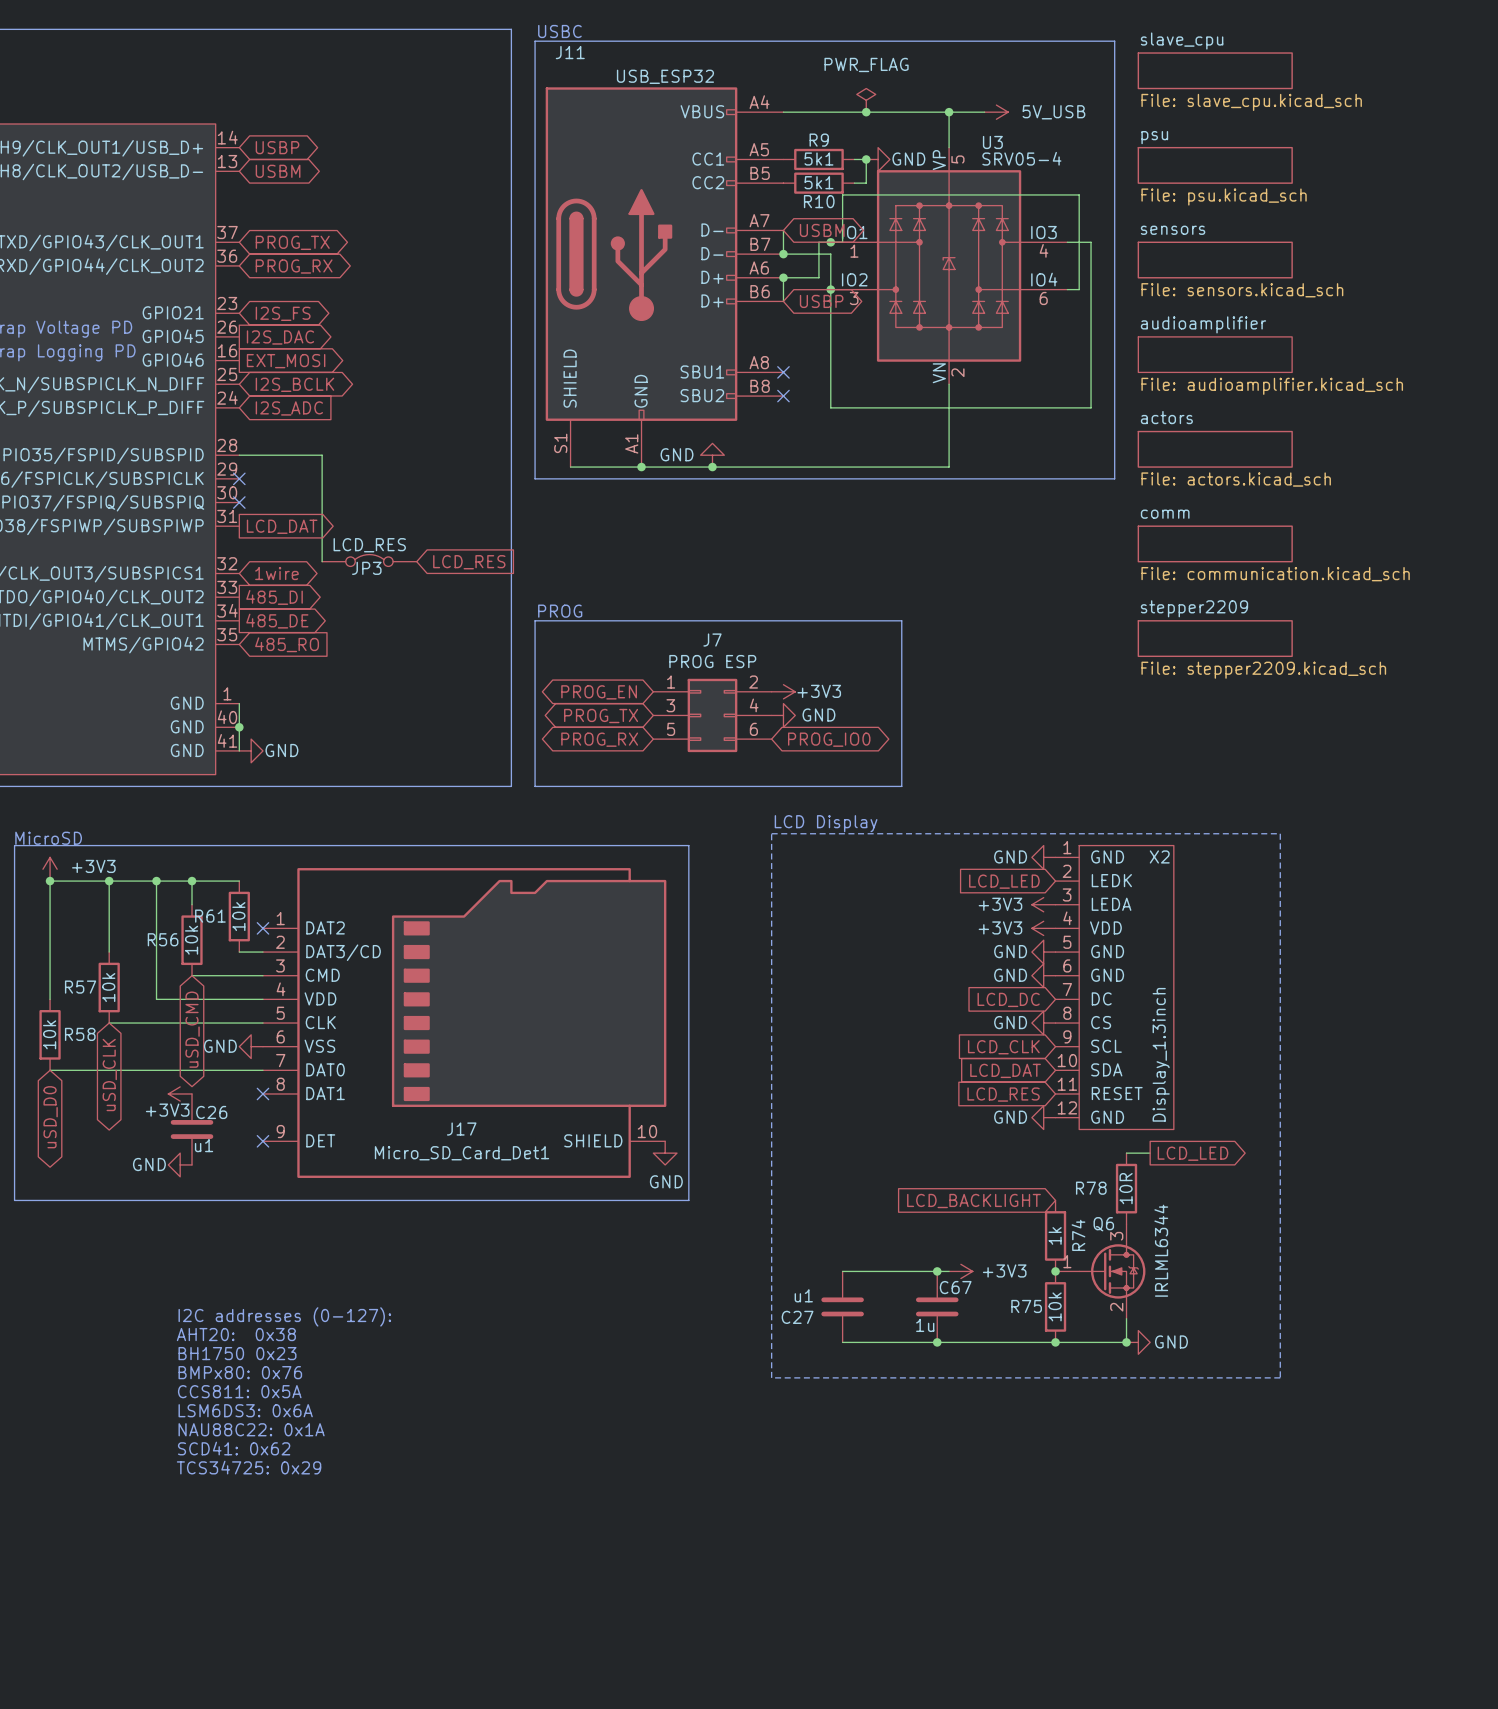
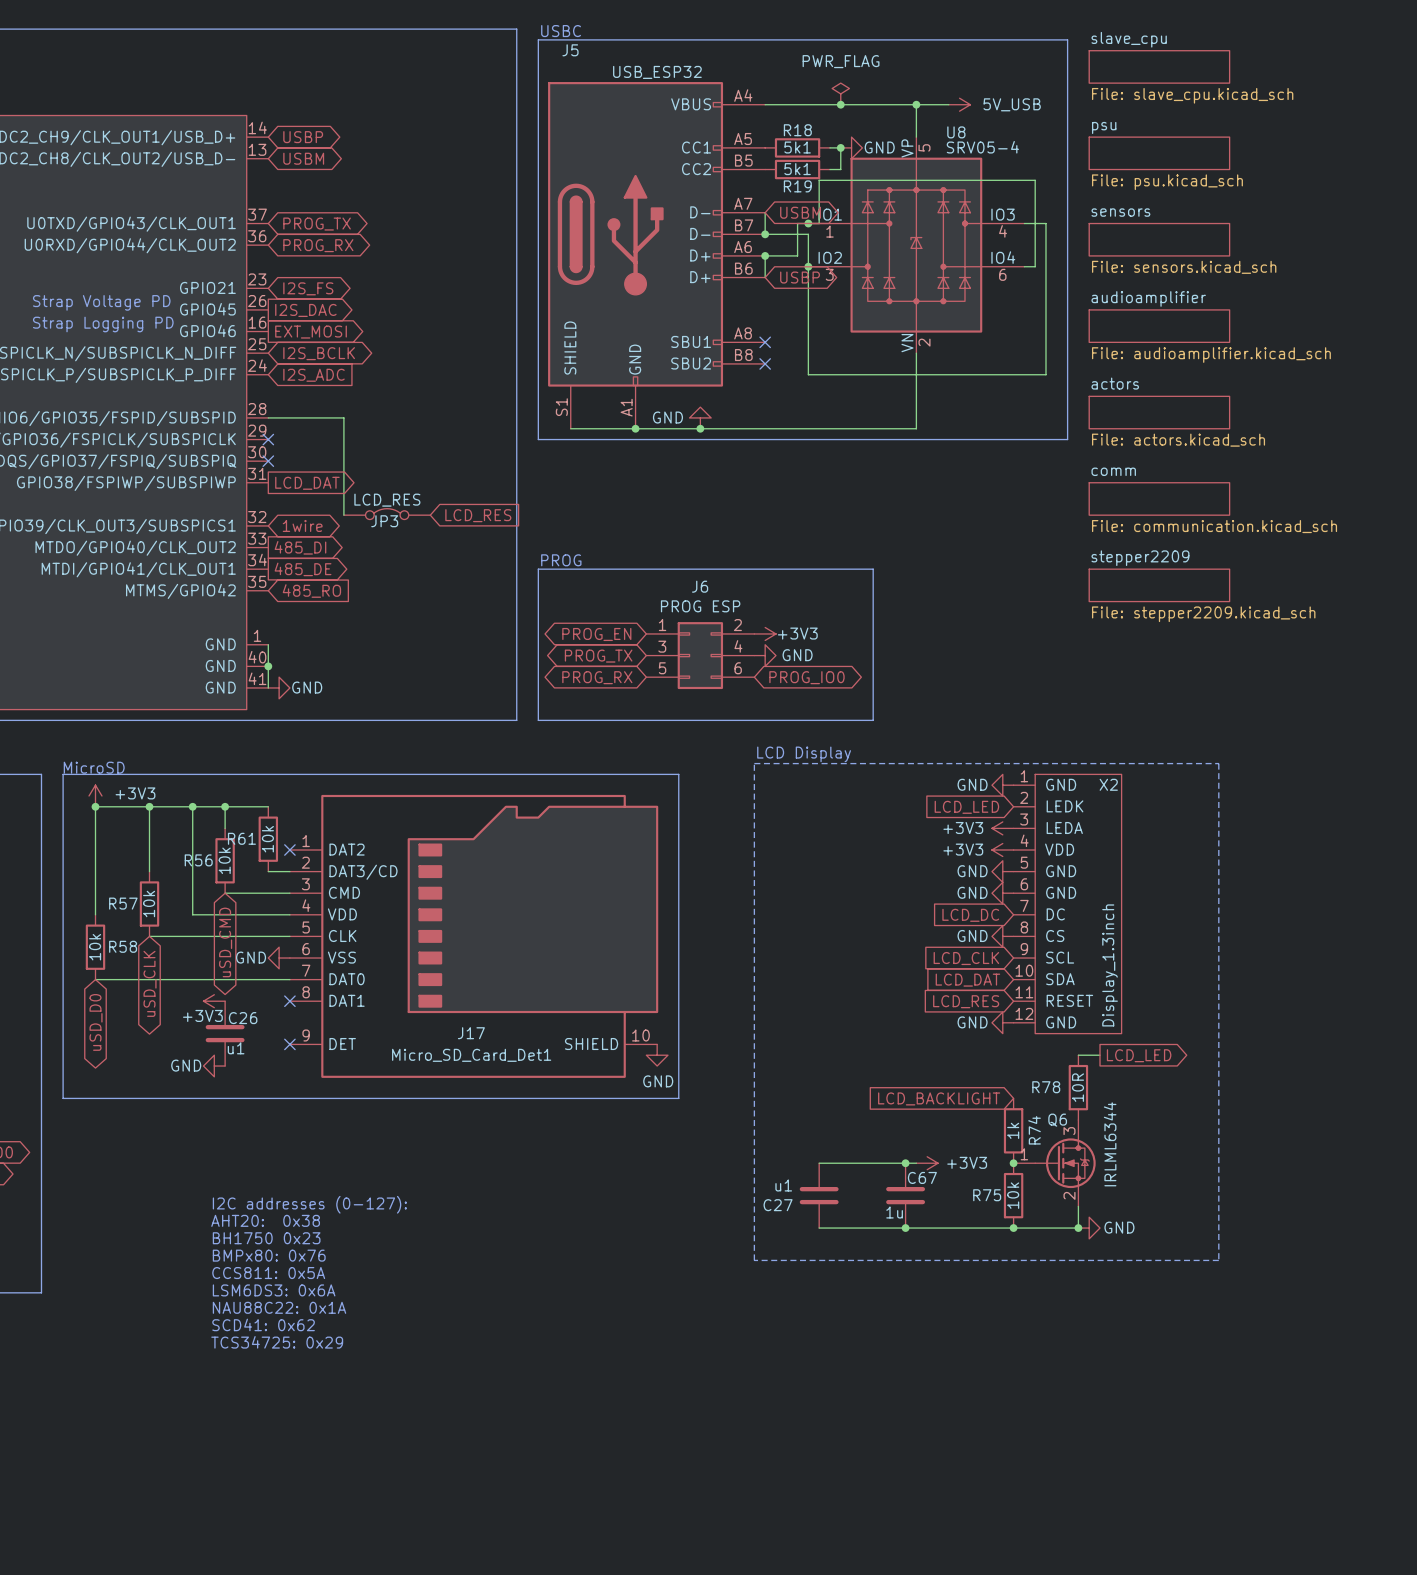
J11 name: J11 (570, 52) -> J5 (570, 50)
R9 name: R9 (819, 140) -> R18 (797, 130)
U3 name: U3 (992, 142) -> U8 (956, 132)
R10 name: R10 (819, 201) -> R19 (797, 186)
J7 name: J7 (712, 640) -> J6 (700, 586)

